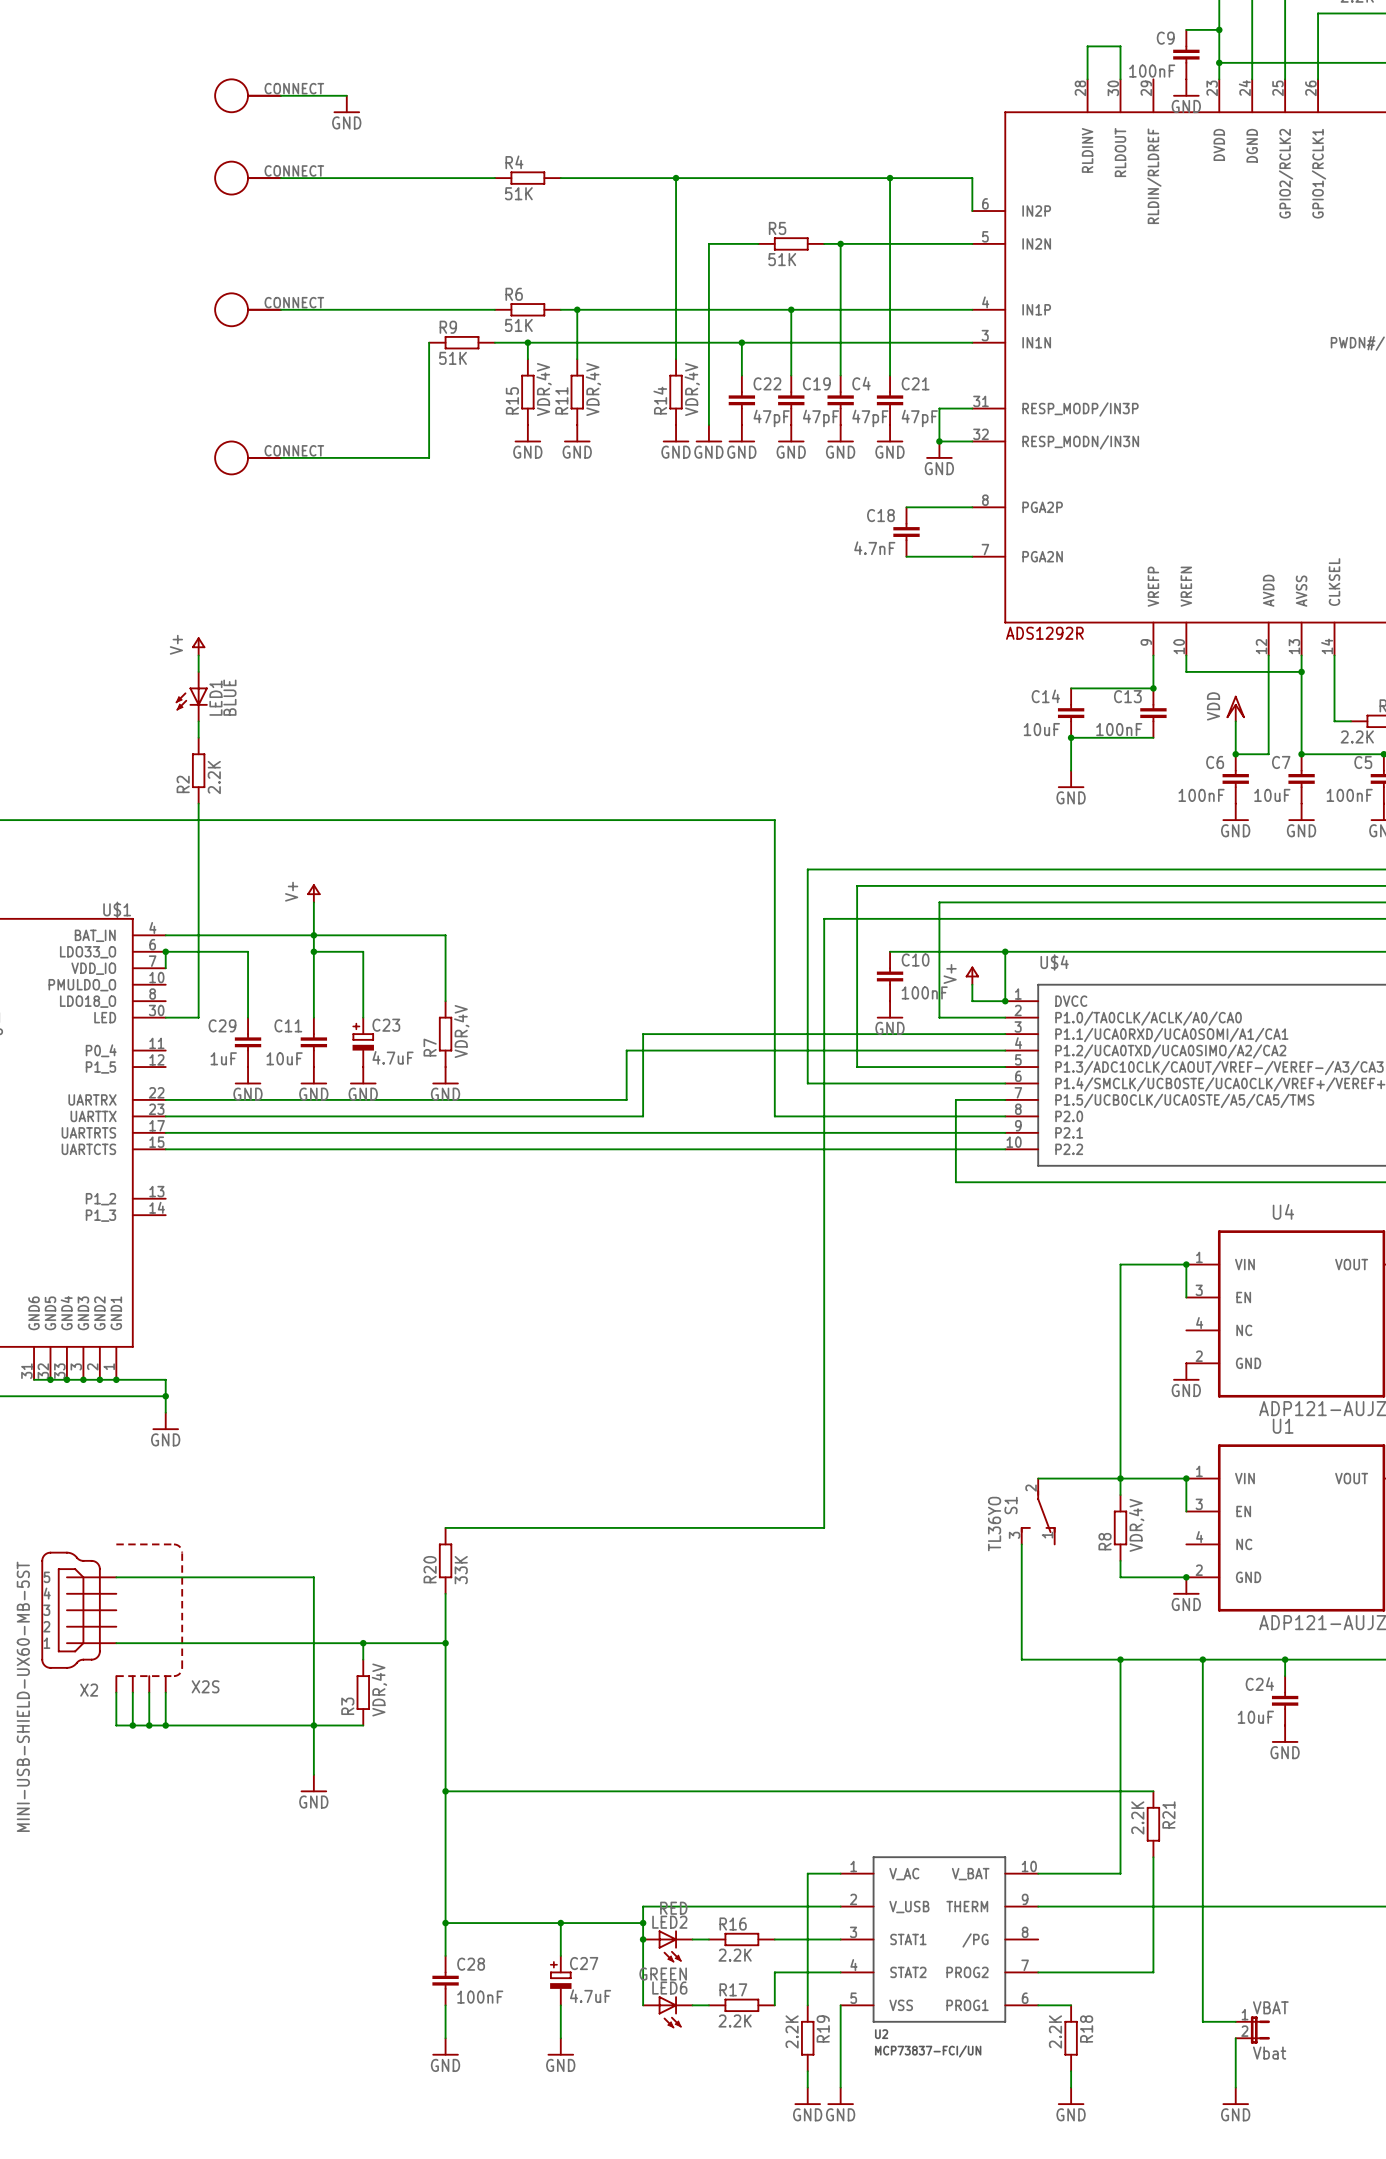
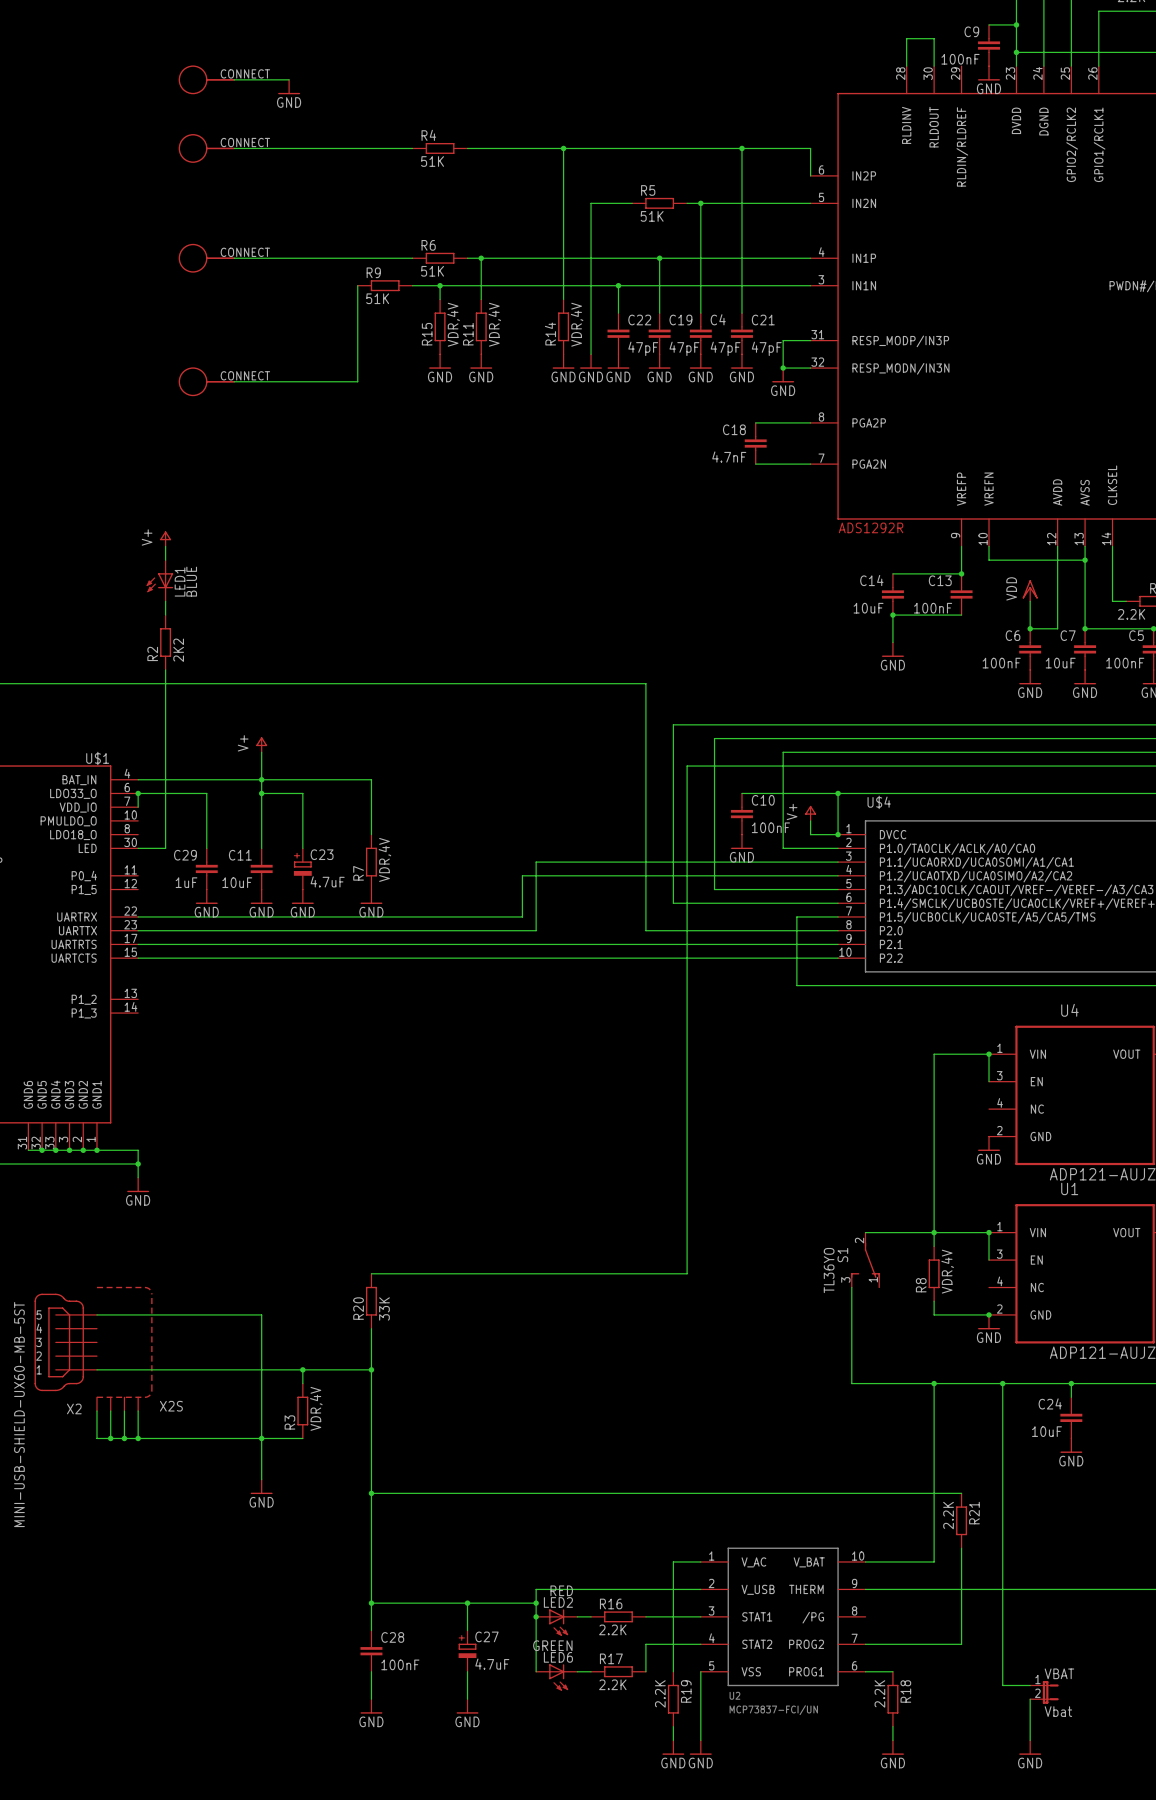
R2 value: 2.2K (214, 777) -> 2K2 (178, 650)

